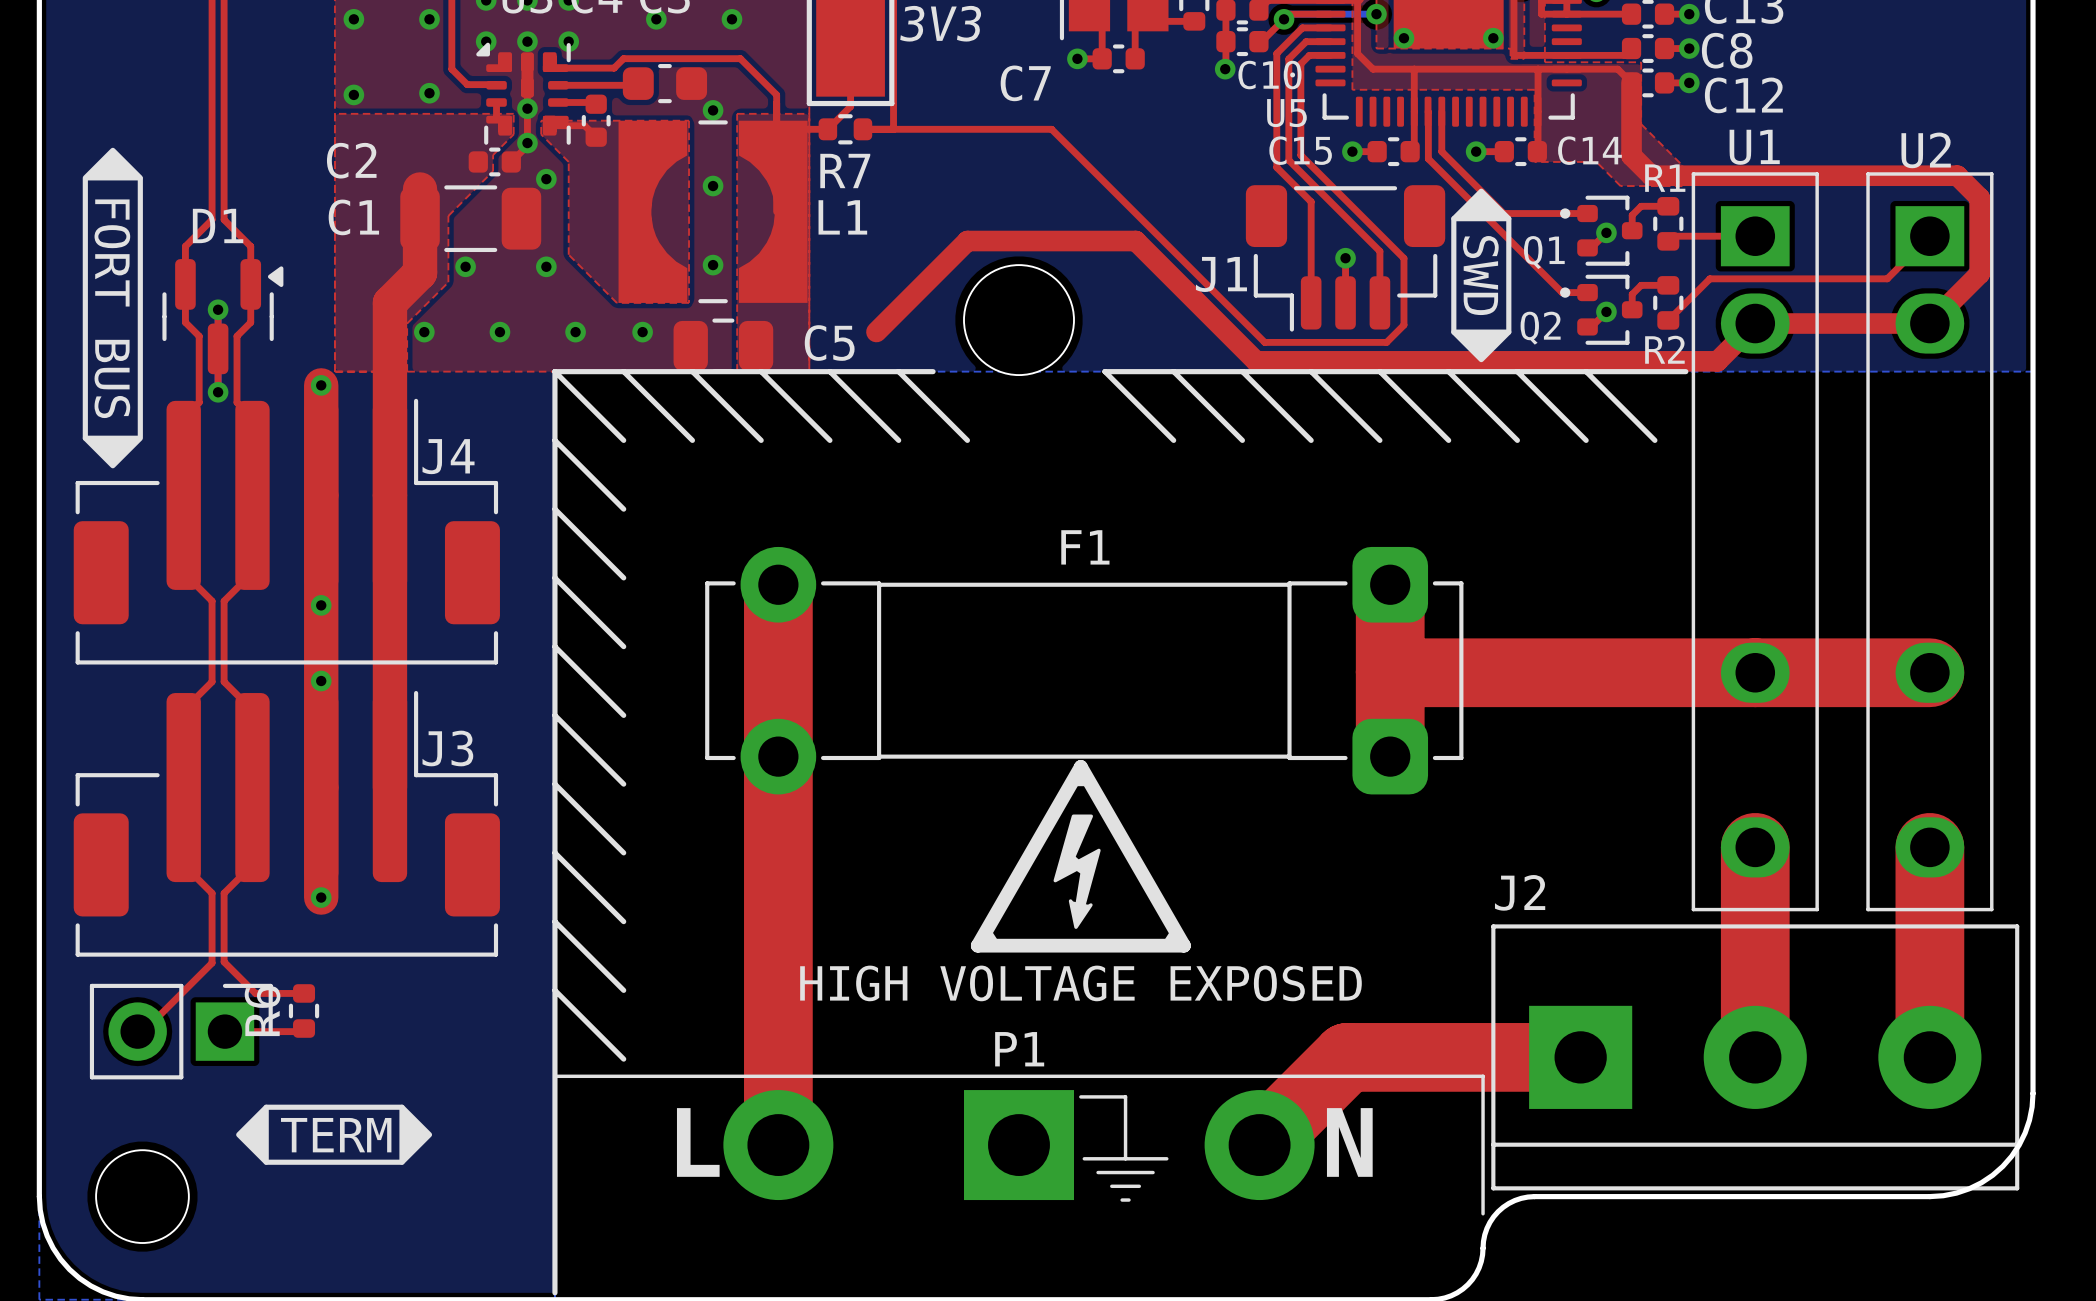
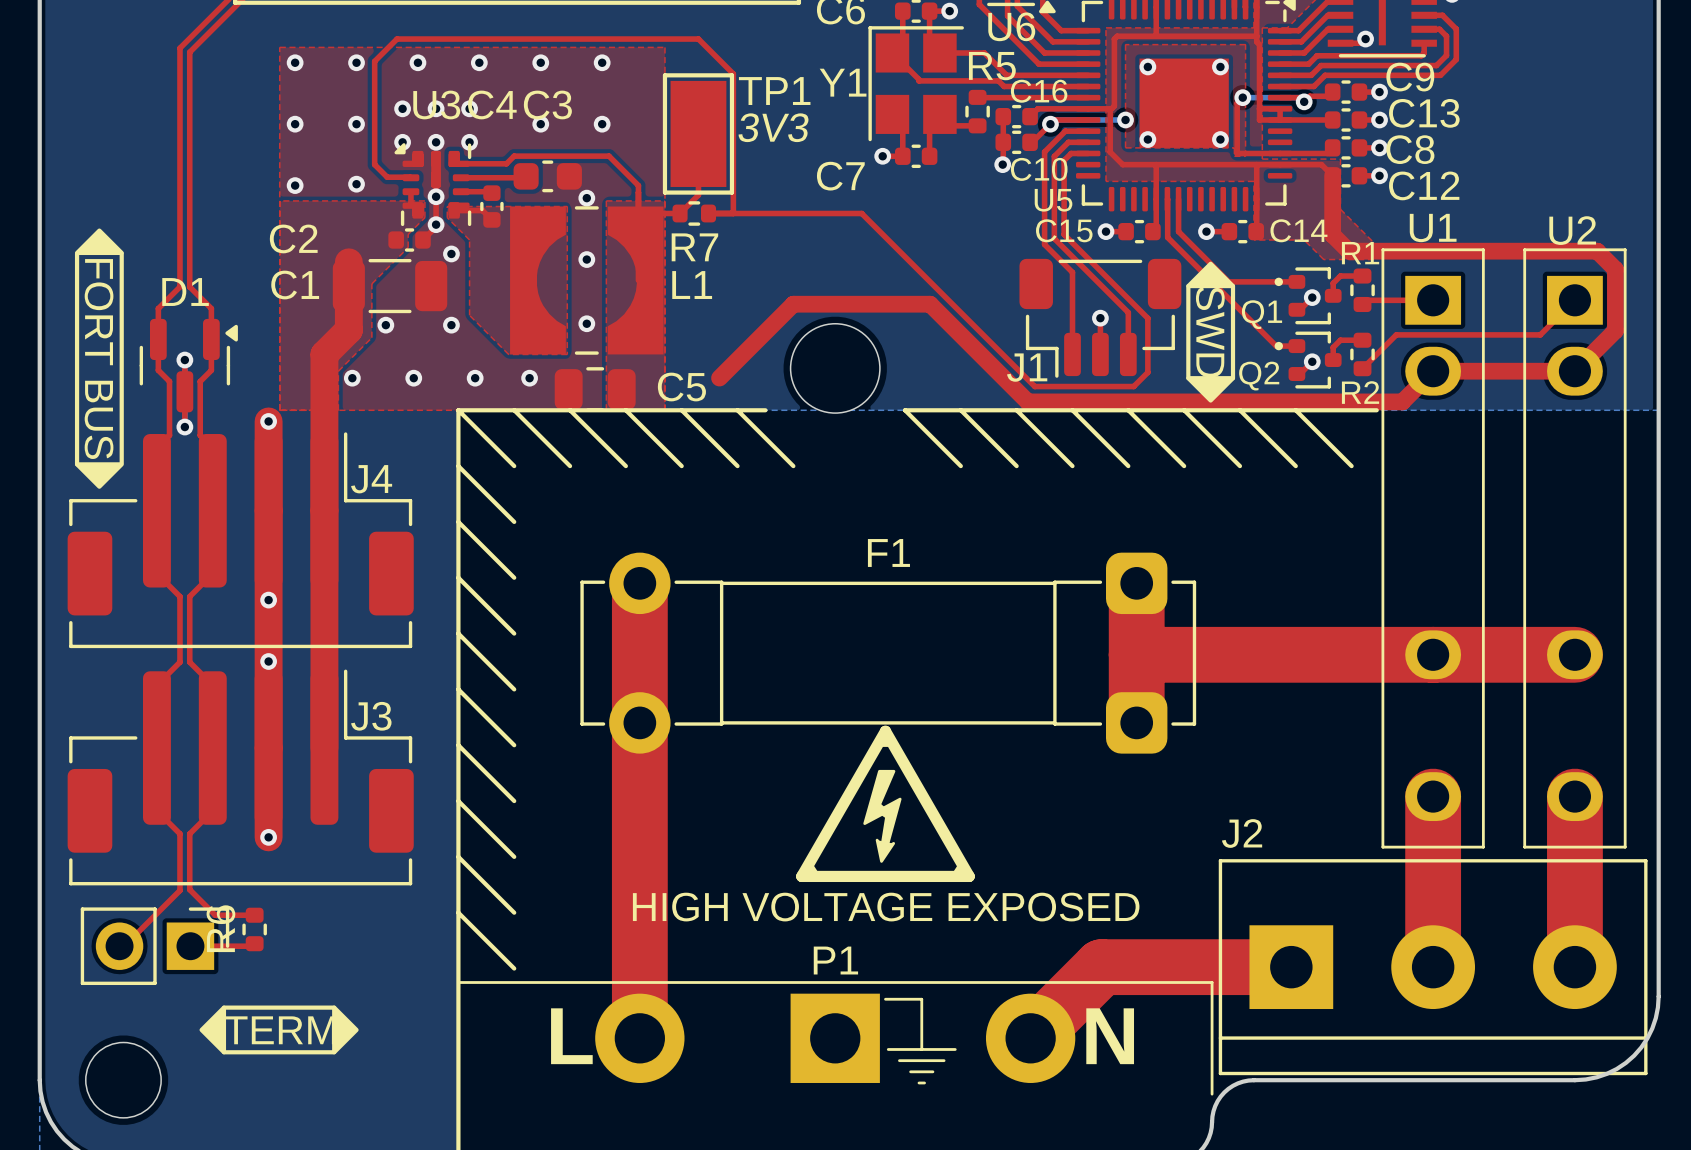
J1 name position: J1 (1221, 274) -> J1 (1027, 367)

